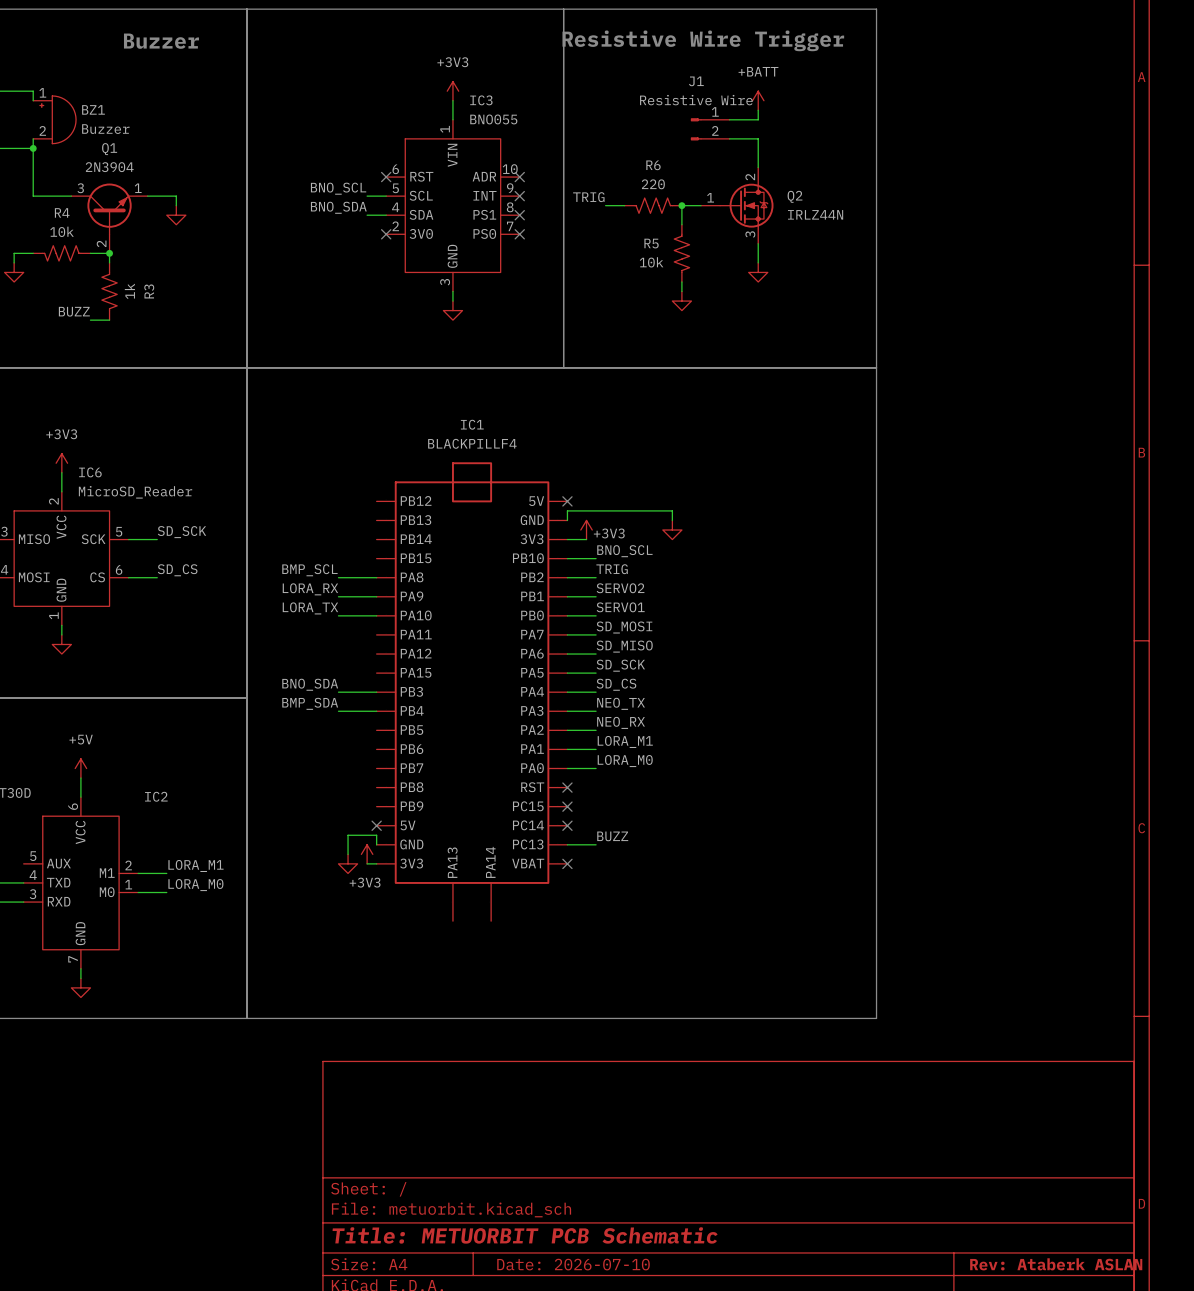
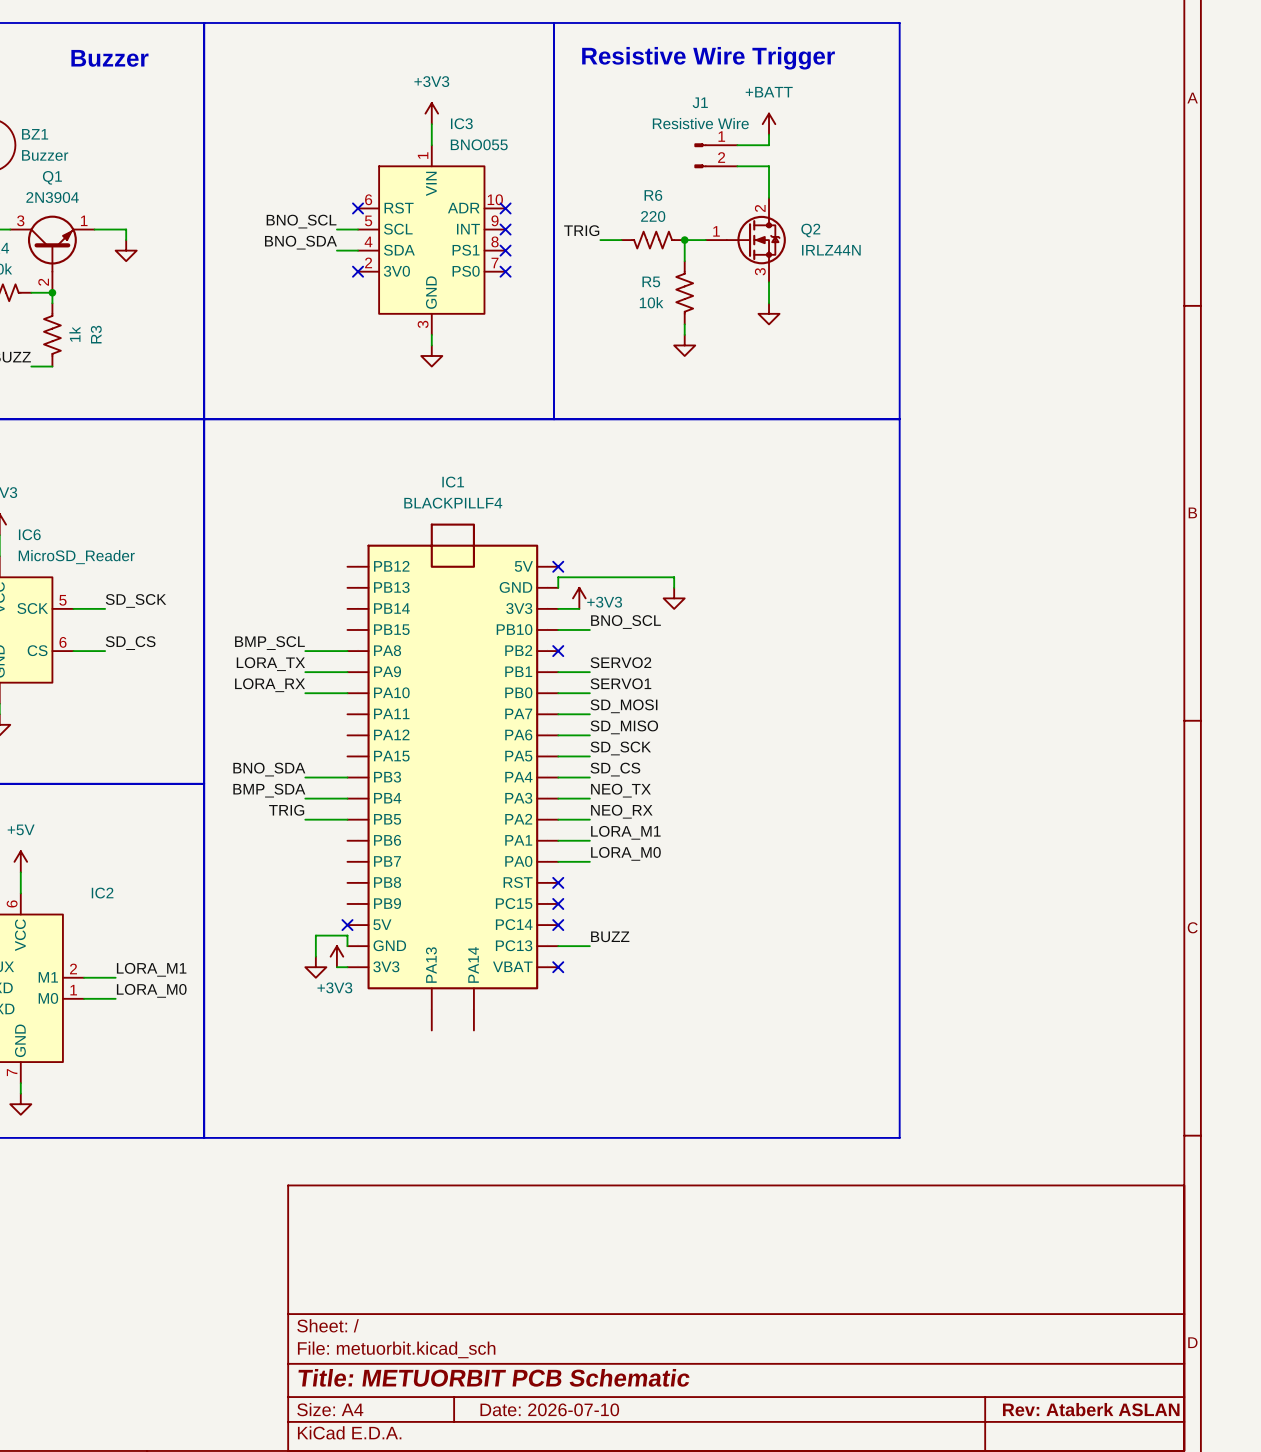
label: TRIG (612, 569) -> none
wire: (567, 577) (596, 577) -> none
no-connect mark: none -> (558, 651)
label: LORA_RX (310, 589) -> LORA_TX (270, 664)
label: LORA_TX (310, 608) -> LORA_RX (270, 685)
label: none -> TRIG (286, 810)
wire: none -> (305, 819) (347, 819)

